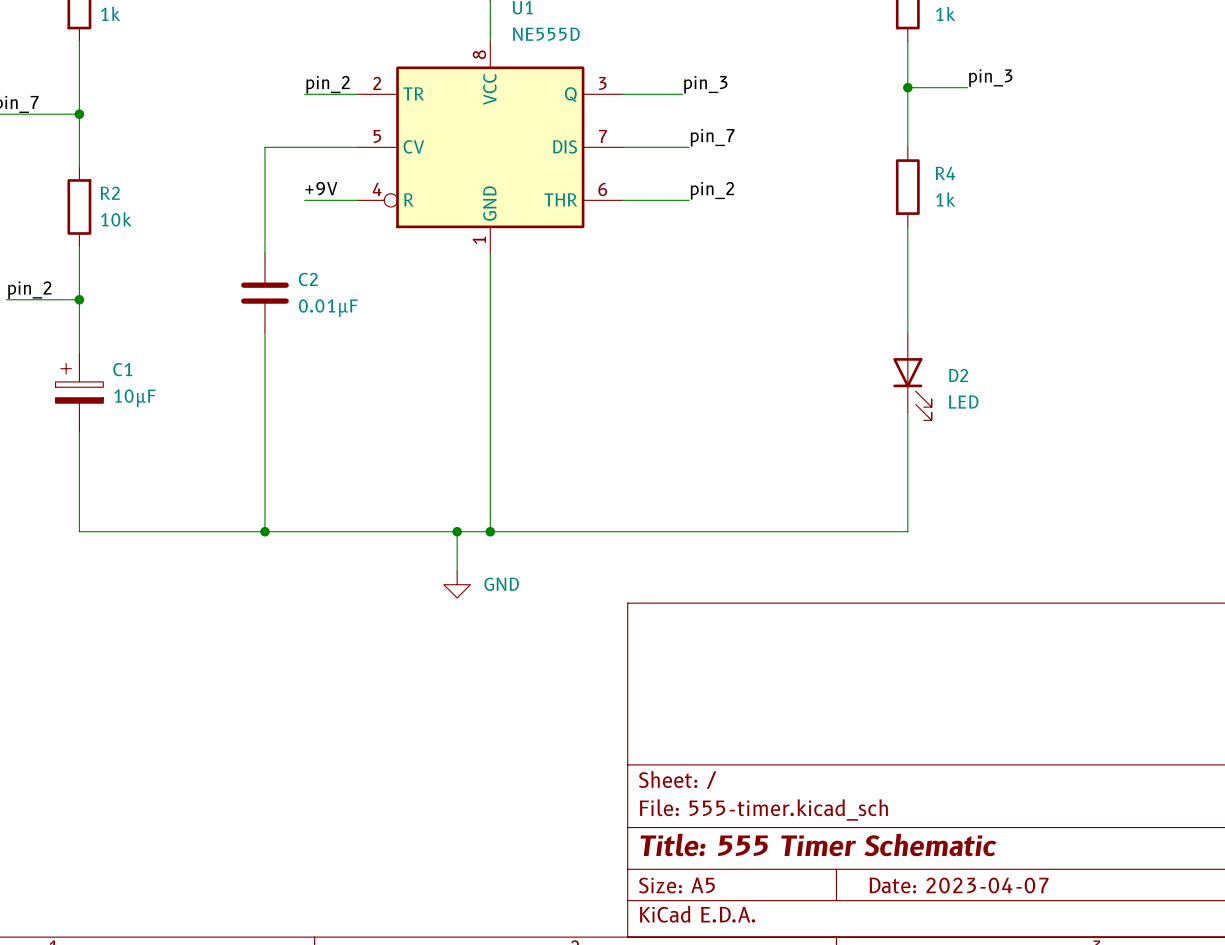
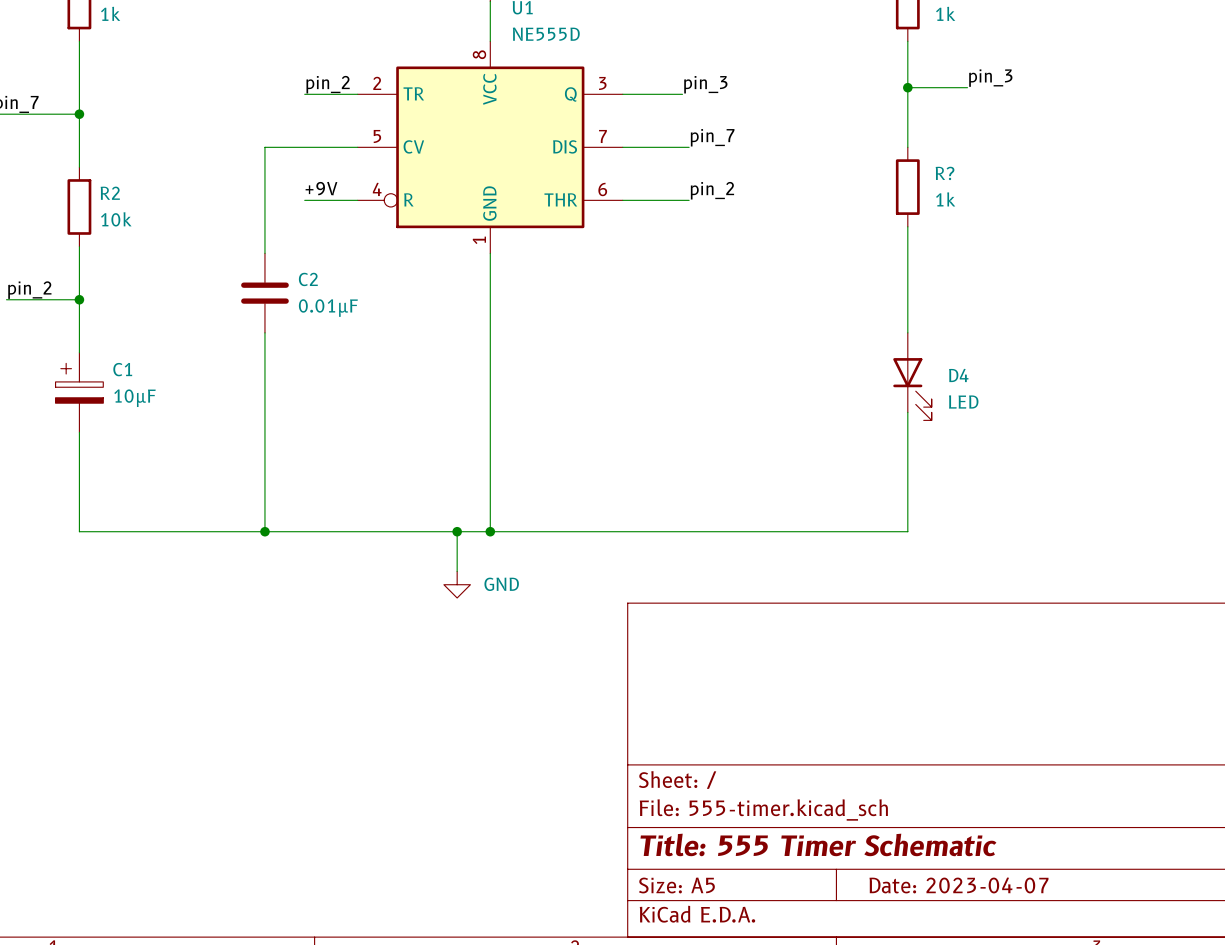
R4 name: R4 (945, 173) -> R? (945, 173)
D2 name: D2 (958, 375) -> D4 (958, 375)

